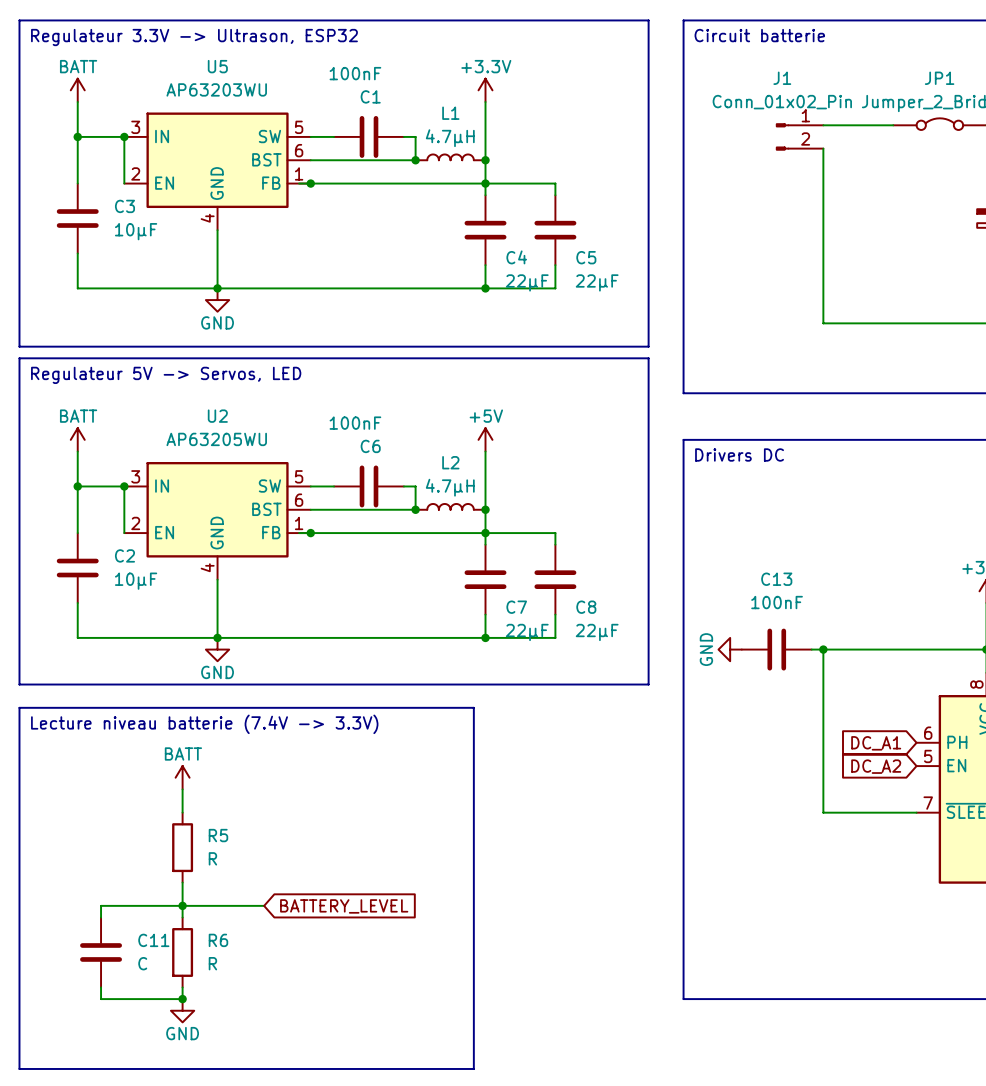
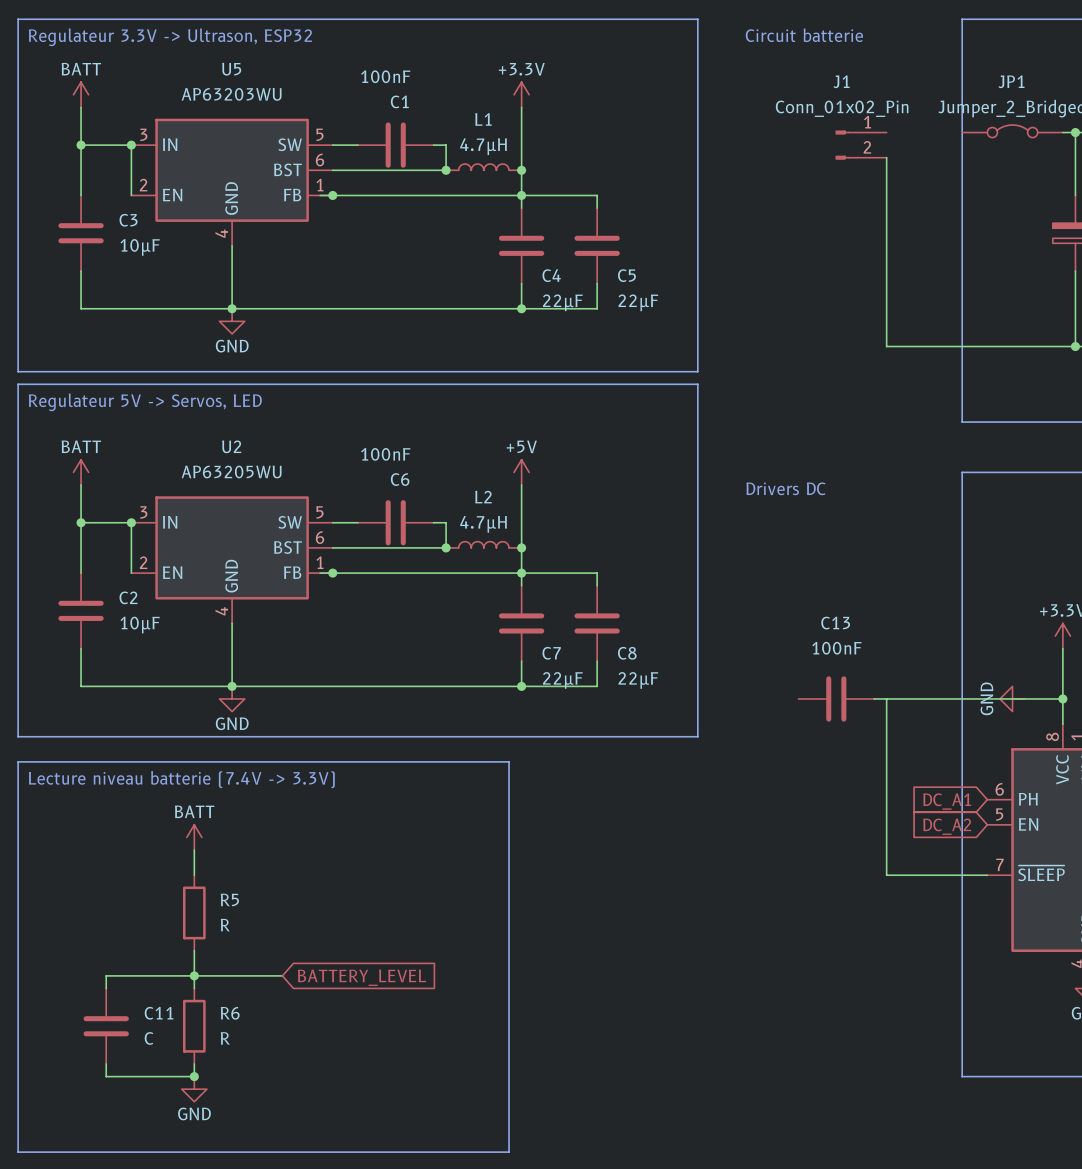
line: (893, 20) (683, 20) (683, 393) (893, 393) -> (962, 19) (962, 422)
wire: (823, 125) (893, 125) -> none
line: (893, 439) (683, 439) (683, 999) (893, 999) -> (962, 472) (962, 1076)
power symbol: GND (730, 649) -> none
junction: (823, 649) -> none
power symbol: none -> GND (1012, 698)

